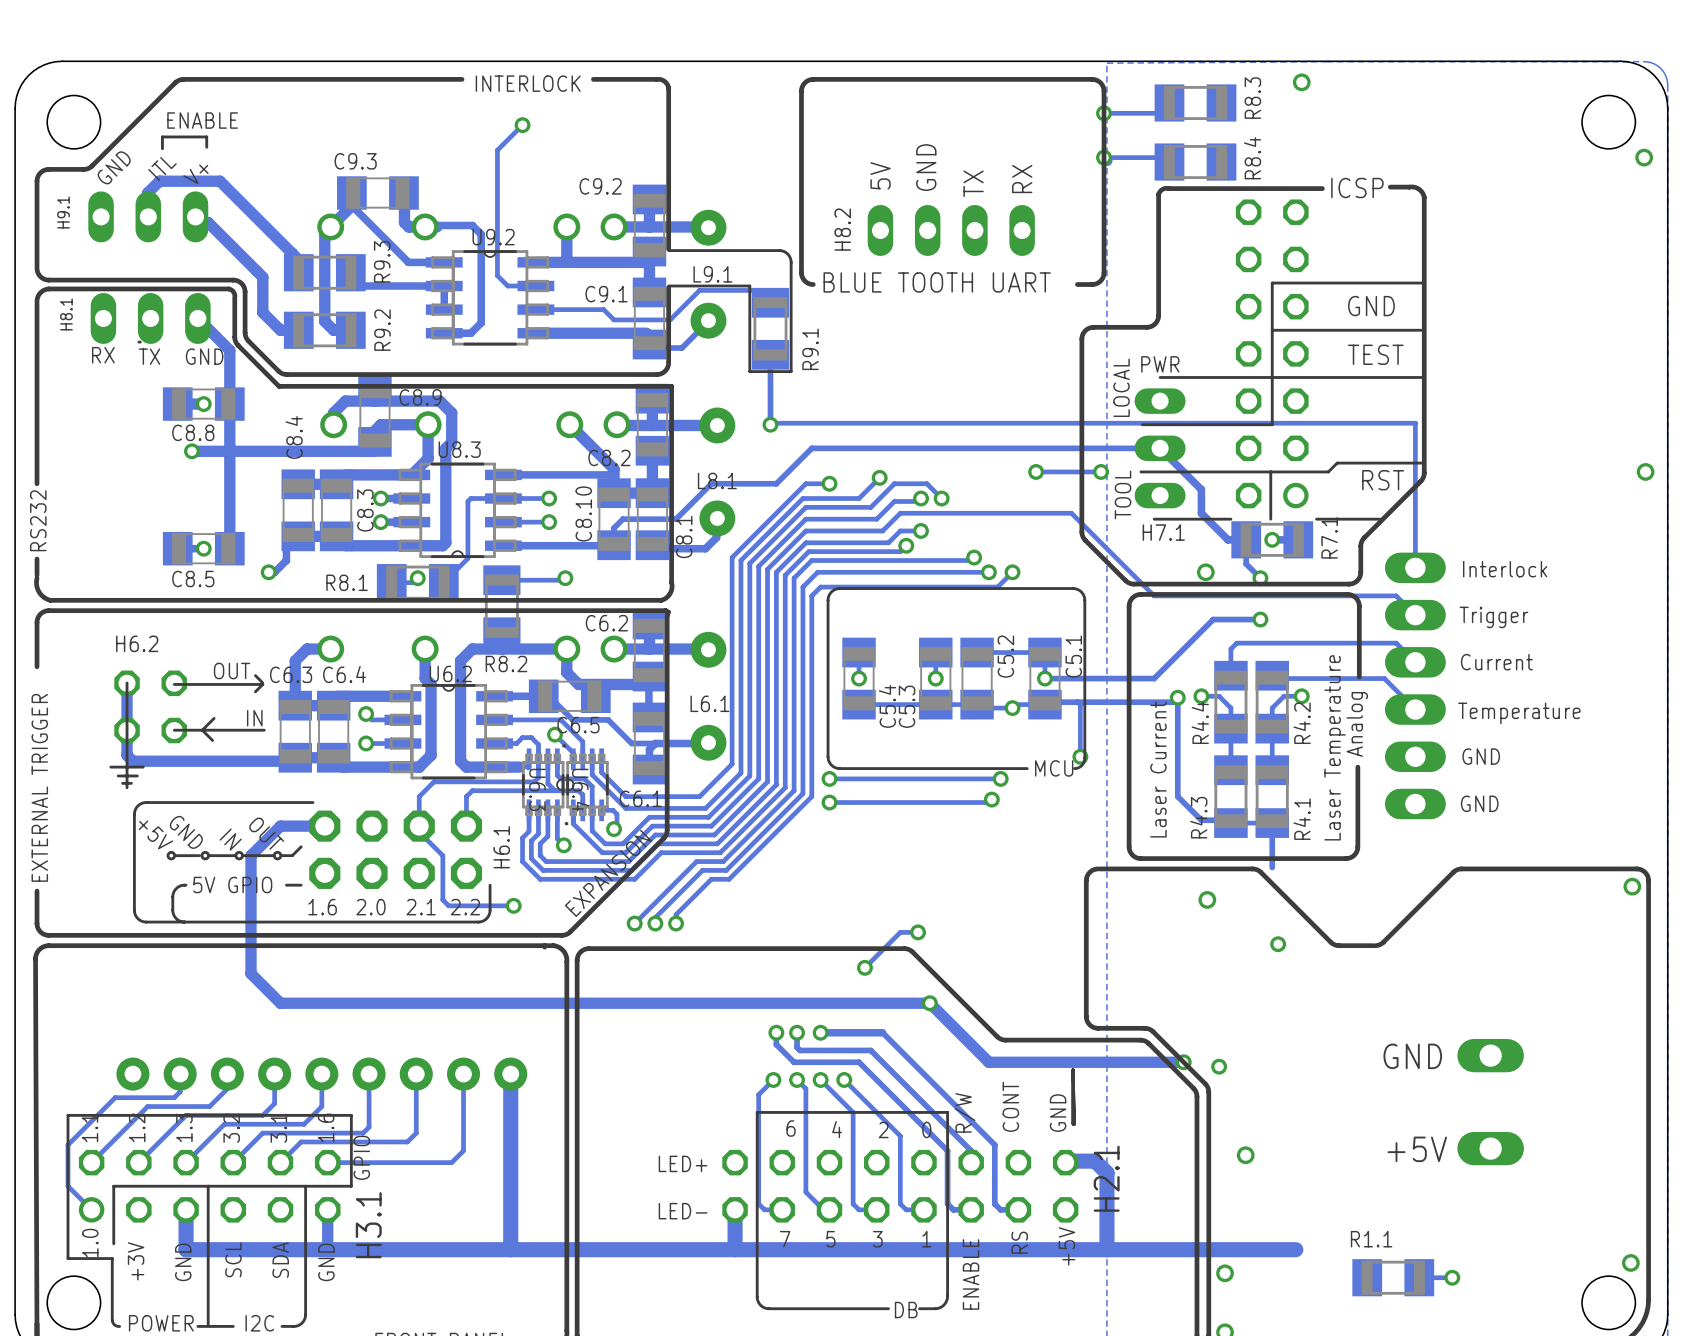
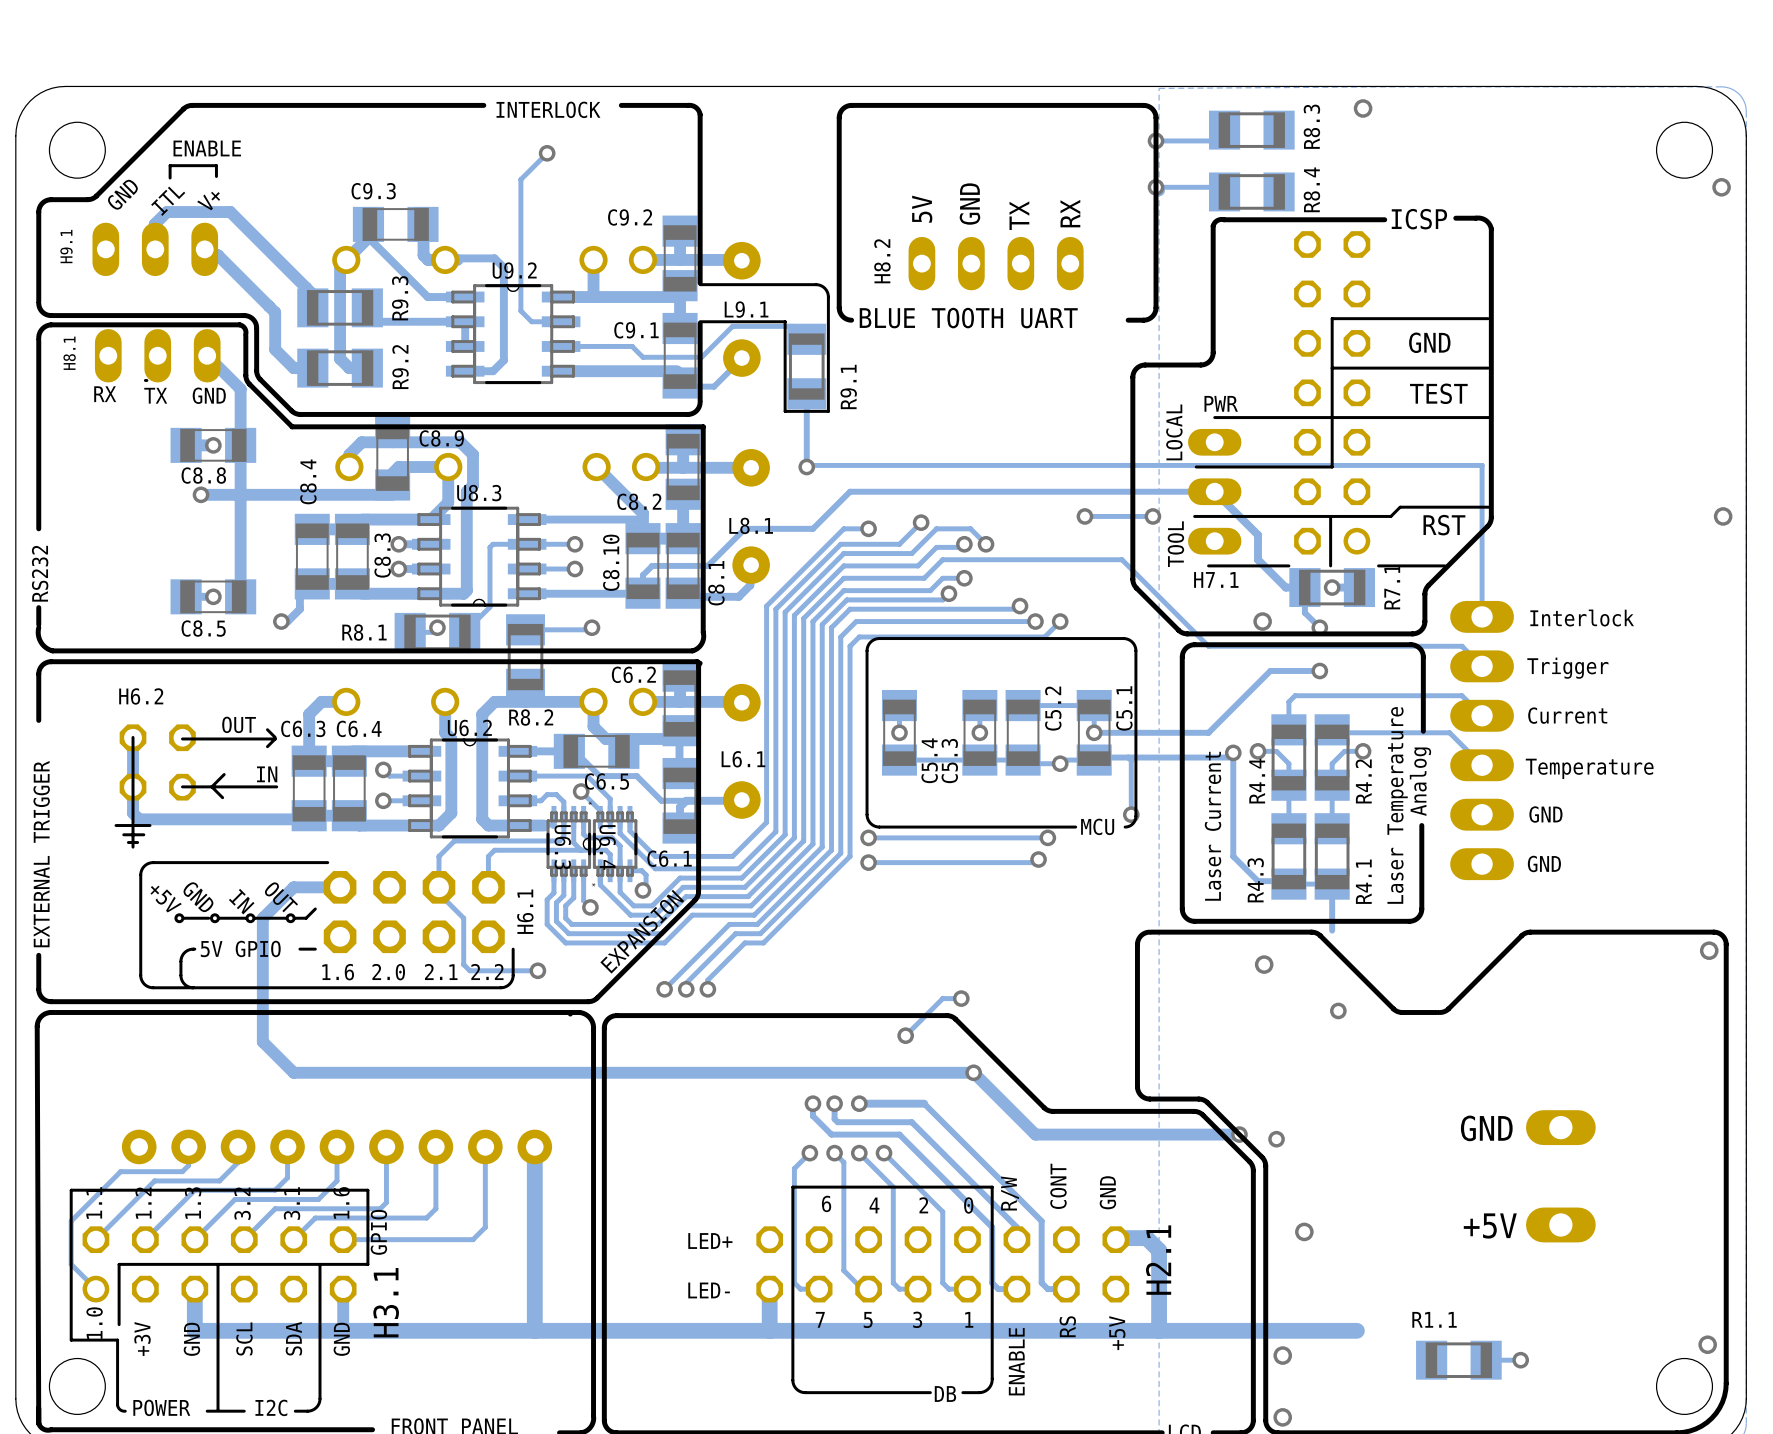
drawing: [1071, 1068, 1076, 1126] -> none

